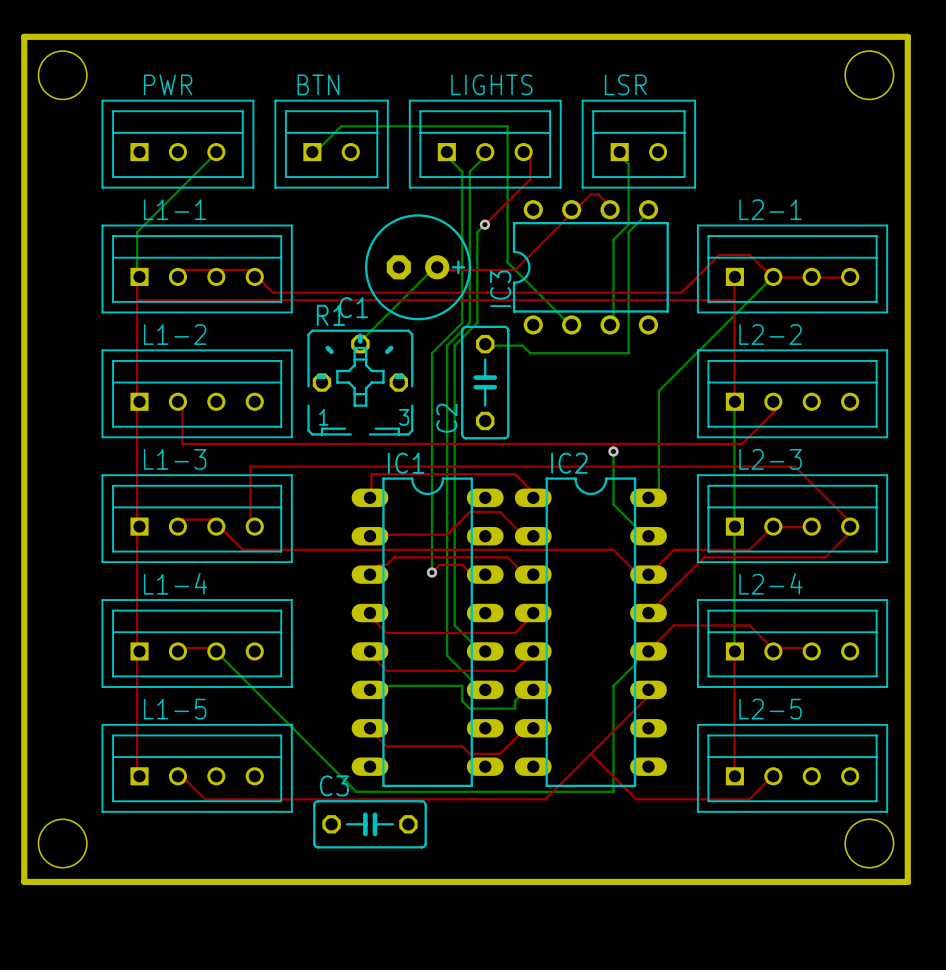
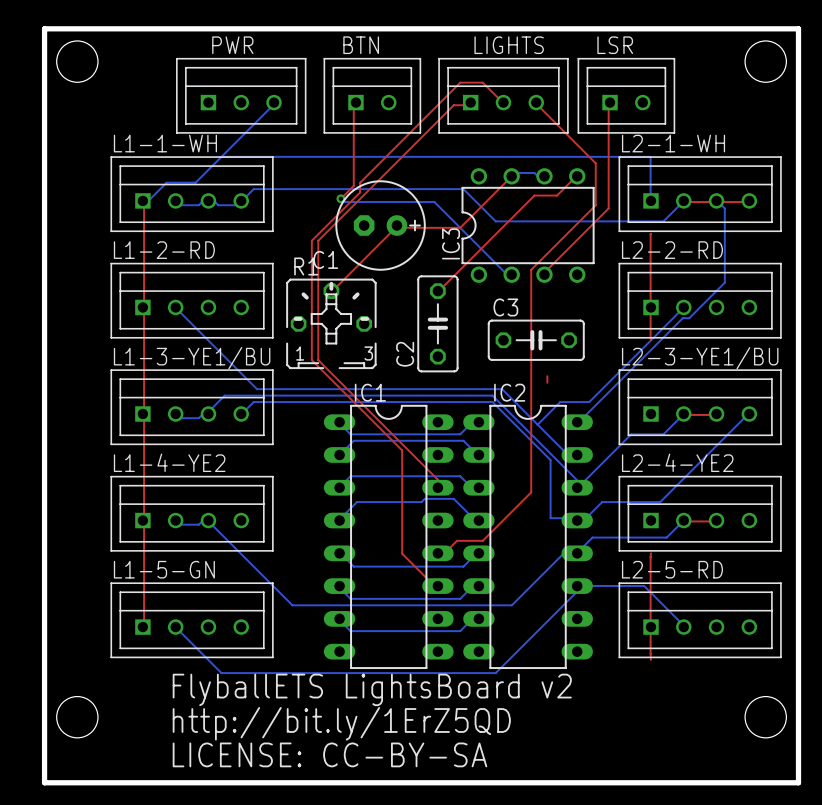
bottom track: none -> (274, 102) (195, 182) (166, 182) (150, 198) (144, 198) (142, 200)
top track: none -> (355, 102) (353, 105) (353, 185) (340, 198)
top track: none -> (503, 102) (482, 82) (460, 82) (360, 182) (360, 192) (311, 240) (311, 360) (402, 450) (402, 553) (437, 589) (437, 586)
top track: none -> (536, 102) (595, 163) (595, 205) (531, 269) (531, 492) (482, 540) (457, 540) (447, 550) (440, 550) (437, 553)
top track: none -> (610, 102) (608, 208) (544, 274)
PWR position: (177, 144) -> (241, 95)
BTN position: (331, 144) -> (372, 95)
LIGHTS position: (485, 144) -> (503, 95)
LSR position: (638, 144) -> (626, 95)
bottom track: (216, 152) (137, 232) (137, 270) (139, 276) -> none
bottom track: (312, 152) (318, 149) (341, 126) (507, 126) (507, 262) (568, 322) -> (340, 198) (344, 202) (434, 202) (505, 273) (508, 273)
bottom track: (446, 152) (447, 156) (462, 171) (462, 322) (432, 353) (432, 572) -> none
bottom track: (485, 152) (484, 156) (469, 171) (469, 322) (447, 345) (447, 655) (484, 693) (485, 689) -> none
top track: (523, 152) (530, 156) (530, 179) (484, 224) -> none
bottom track: (619, 152) (621, 156) (628, 164) (628, 224) (613, 239) (613, 322) (610, 324) -> none
bottom track: none -> (221, 156) (650, 156) (650, 200)
bottom track: none -> (511, 176) (515, 172) (534, 172) (537, 176) (544, 176)
top track: (610, 209) (613, 209) (598, 194) (590, 194) (575, 209) (571, 209) (568, 217) (515, 270) (511, 270) -> (511, 176) (460, 227)
top track: none -> (577, 176) (557, 195) (534, 195) (437, 291)
bottom track: (648, 209) (628, 232) (628, 353) (530, 353) (522, 345) (485, 344) -> none
bottom track: (484, 224) (477, 232) (477, 322) (454, 345) (454, 625) (484, 655) (485, 651) -> none
via: (484, 224) -> none
L1-1-WH: none -> (192, 194)
L2-1-WH: none -> (700, 194)
via: none -> (340, 198)
top track: none -> (142, 200) (142, 627)
bottom track: none -> (175, 200) (179, 205) (198, 205) (202, 202) (208, 200) (215, 202) (218, 205) (237, 205) (253, 189) (463, 189) (495, 221) (663, 221) (683, 200)
top track: none -> (683, 200) (749, 200)
top track: none -> (396, 225) (331, 291)
bottom track: (437, 267) (432, 270) (363, 338) (360, 344) -> none
L1-1: (197, 268) -> none
L2-1: (792, 268) -> none
top track: (139, 276) (137, 277) (137, 398) (139, 401) (137, 406) (137, 519) (139, 526) (137, 527) (137, 648) (139, 651) (137, 655) (137, 769) (139, 776) -> none
top track: (177, 276) (182, 270) (212, 270) (216, 276) (220, 270) (250, 270) (254, 276) (258, 277) (273, 292) (681, 292) (719, 254) (749, 254) (764, 270) (772, 270) (773, 276) (850, 276) -> none
bottom track: (773, 276) (658, 391) (658, 489) -> (716, 200) (724, 208) (724, 282) (689, 318) (682, 318) (586, 414)
top track: (137, 300) (734, 300) -> none
L1-2-RD: none -> (192, 300)
L2-2-RD: none -> (700, 300)
bottom track: none -> (683, 307) (589, 402) (560, 402) (537, 424)
L1-2: (197, 393) -> none
L2-2: (792, 393) -> none
top track: (177, 401) (182, 406) (182, 443) (742, 443) (779, 406) (773, 401) -> none
bottom track: (734, 401) (734, 651) -> none
bottom track: (613, 451) (613, 504) (643, 534) (648, 536) -> (175, 307) (256, 389) (502, 389) (566, 453) (577, 454)
via: (613, 451) -> none
L1-3-YE1/BU: none -> (192, 407)
L2-3-YE1/BU: none -> (700, 407)
bottom track: none -> (175, 414) (179, 418) (198, 418) (202, 414) (208, 414) (224, 395) (492, 395) (579, 482) (582, 482) (577, 487) (579, 485) (631, 434) (663, 434) (683, 414)
bottom track: none -> (241, 414) (253, 402) (492, 402) (550, 460) (550, 518) (576, 518) (577, 520) (579, 518) (586, 518) (602, 502) (660, 502) (749, 414)
top track: none -> (683, 414) (716, 414)
top track: (370, 497) (371, 474) (515, 474) (537, 496) (533, 497) -> none
bottom track: none -> (339, 422) (350, 434) (460, 434) (469, 424) (476, 424) (478, 422)
L1-3: (197, 518) -> none
L2-3: (792, 518) -> none
top track: (177, 526) (182, 519) (212, 519) (216, 526) (220, 527) (242, 549) (613, 549) (636, 572) (648, 574) (673, 549) (749, 549) (773, 526) (811, 526) -> none
top track: (254, 526) (250, 519) (250, 466) (794, 466) (847, 519) (850, 526) (855, 527) (825, 557) (704, 557) (648, 613) -> none
top track: (370, 536) (447, 534) (469, 512) (500, 512) (522, 534) (533, 536) -> none
bottom track: none -> (339, 454) (353, 440) (463, 440) (478, 454)
top track: (432, 572) (439, 564) (462, 564) (469, 572) (484, 572) -> (470, 102) (469, 105) (453, 105) (318, 240) (318, 360) (437, 479) (437, 485)
via: (432, 572) -> none
top track: (370, 574) (379, 564) (386, 564) (394, 557) (507, 557) (522, 572) (533, 574) -> none
bottom track: none -> (339, 487) (350, 476) (460, 476) (469, 485) (478, 487)
L1-4-YE2: none -> (192, 513)
L2-4-YE2: none -> (700, 513)
bottom track: none -> (175, 520) (179, 524) (198, 524) (202, 521) (208, 520) (292, 605) (511, 605) (563, 553) (577, 553) (592, 537) (666, 537) (683, 520)
top track: (370, 613) (371, 617) (386, 633) (515, 633) (533, 613) -> none
bottom track: none -> (339, 520) (357, 502) (421, 502) (424, 498) (453, 498) (473, 518) (478, 520)
top track: none -> (683, 520) (716, 520)
L1-4: (197, 643) -> none
L2-4: (792, 643) -> none
top track: (177, 651) (182, 648) (212, 648) (216, 651) -> none
bottom track: (216, 651) (356, 791) -> (175, 627) (221, 673) (327, 673)
top track: (370, 651) (371, 655) (386, 670) (515, 670) (533, 651) -> none
bottom track: none -> (339, 553) (353, 566) (463, 566) (478, 553)
top track: (648, 651) (673, 625) (749, 625) (773, 651) (779, 648) (810, 648) (811, 651) -> none
bottom track: (648, 651) (643, 648) (636, 655) (636, 663) (613, 685) (613, 791) (552, 791) -> (683, 627) (644, 585) (577, 586) (579, 589) (495, 673)
bottom track: (370, 689) (371, 685) (462, 685) (462, 701) (469, 708) (515, 708) (515, 701) -> (339, 586) (350, 598) (460, 598) (463, 595)
top track: (648, 689) (651, 693) (545, 799) (205, 799) (182, 776) (177, 776) -> none
top track: (370, 728) (386, 746) (462, 746) (469, 753) (500, 753) (522, 731) (530, 731) (533, 728) -> none
bottom track: none -> (339, 618) (350, 631) (460, 631) (469, 621) (476, 621) (478, 618)
L1-5-GN: none -> (192, 620)
L2-5-RD: none -> (700, 620)
top track: (590, 753) (636, 799) (749, 799) (773, 776) -> none
L1-5: (197, 768) -> none
L2-5: (792, 768) -> none
text: none -> FlyballETS LightsBoard v2 (372, 689)
C3 position: (370, 824) -> (536, 340)
text: none -> http://bit.ly/1ErZ5QD (341, 723)
board edge: (24, 881) (907, 881) -> (44, 749) (44, 782) (798, 782) (798, 749)
text: none -> LICENSE: CC-BY-SA (329, 754)

